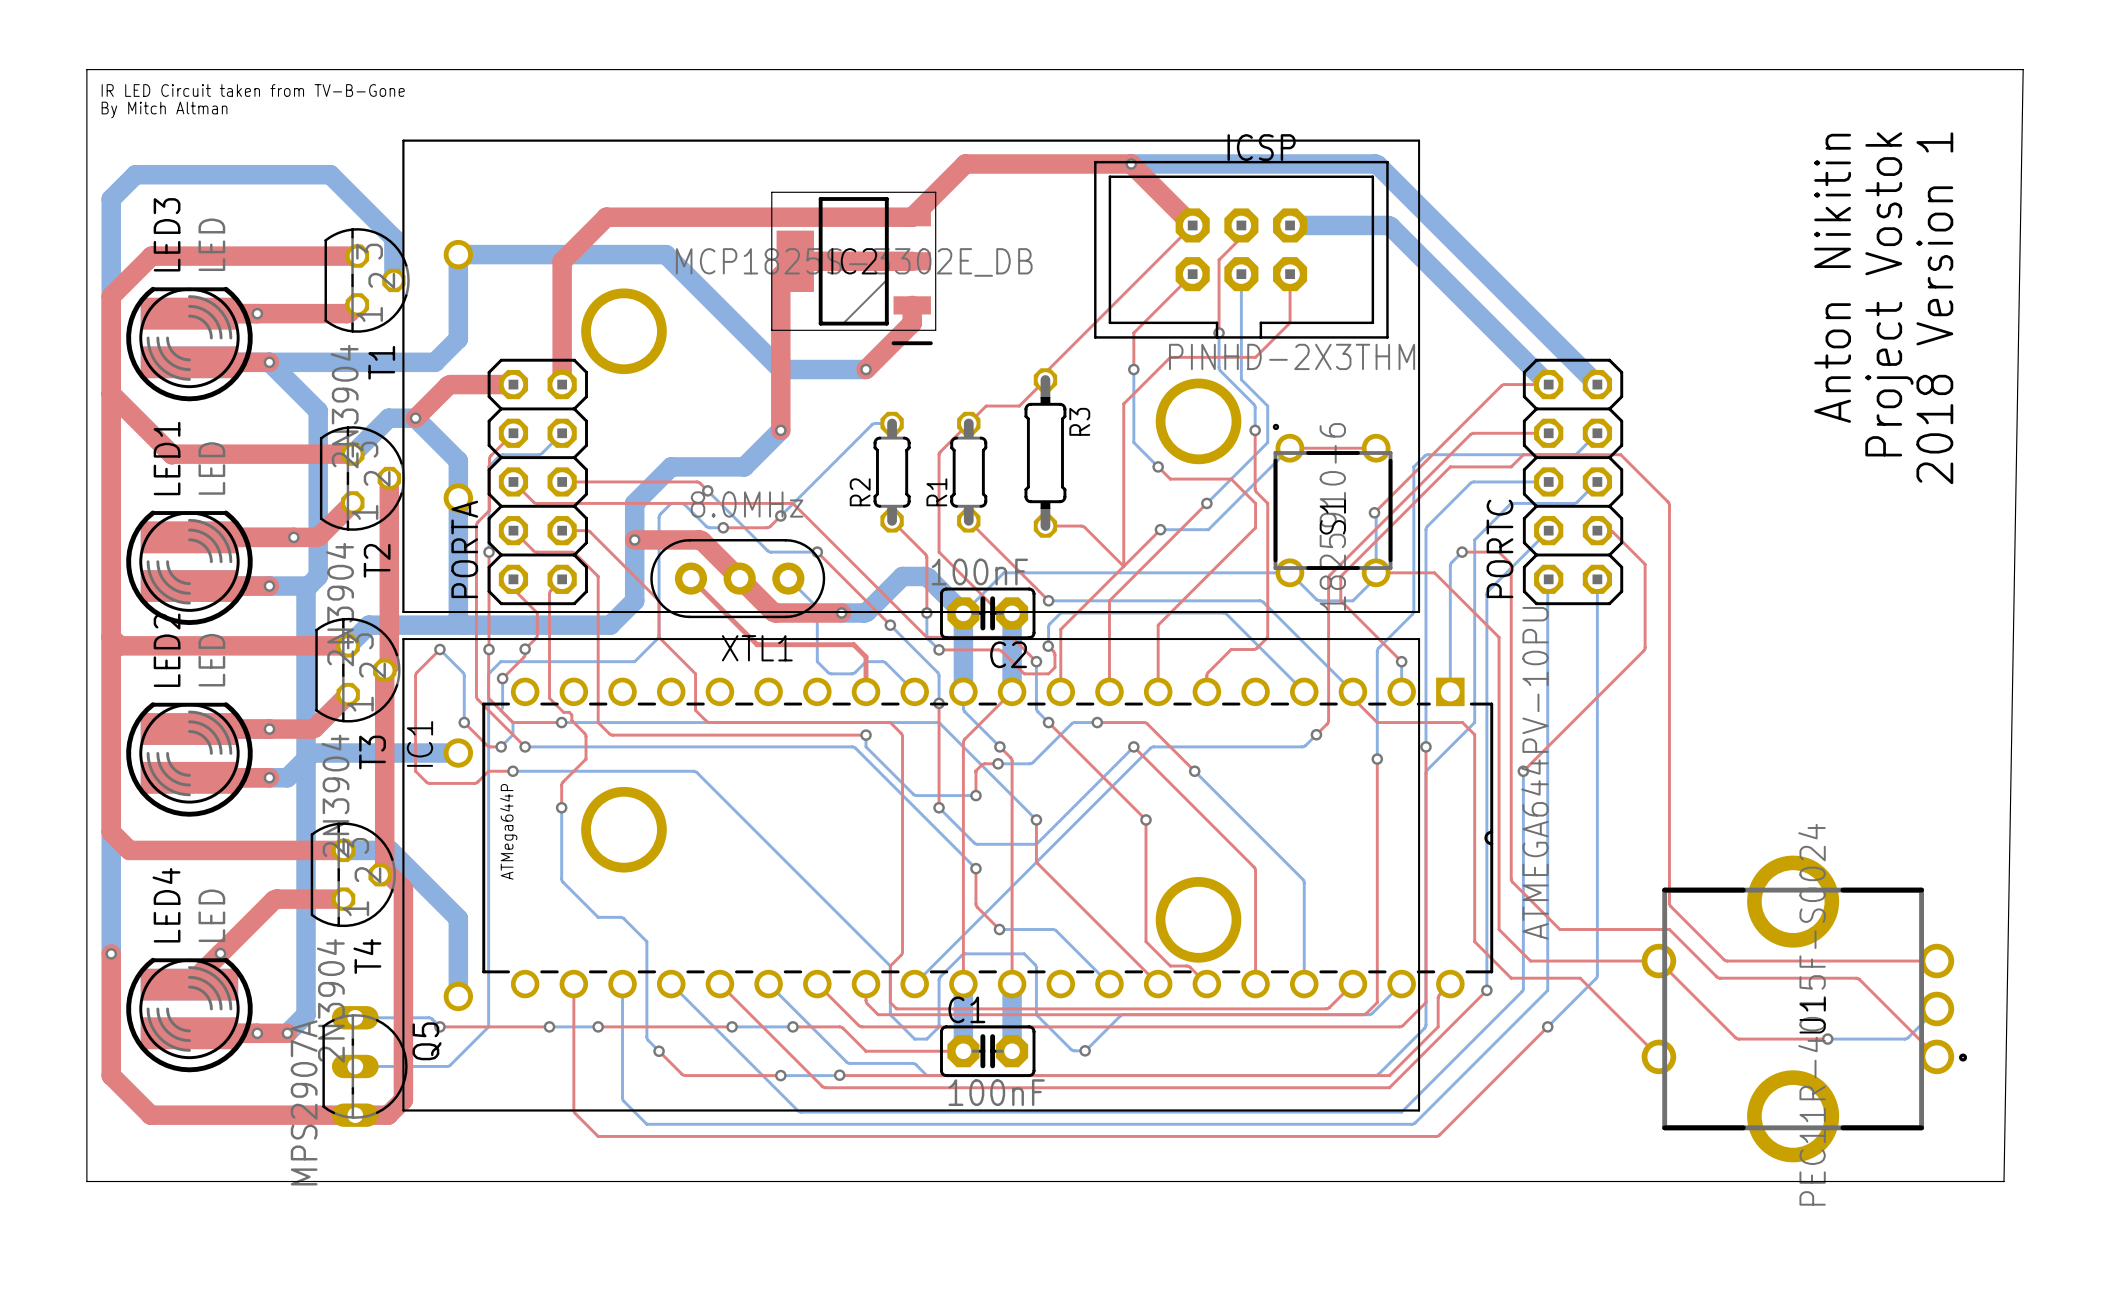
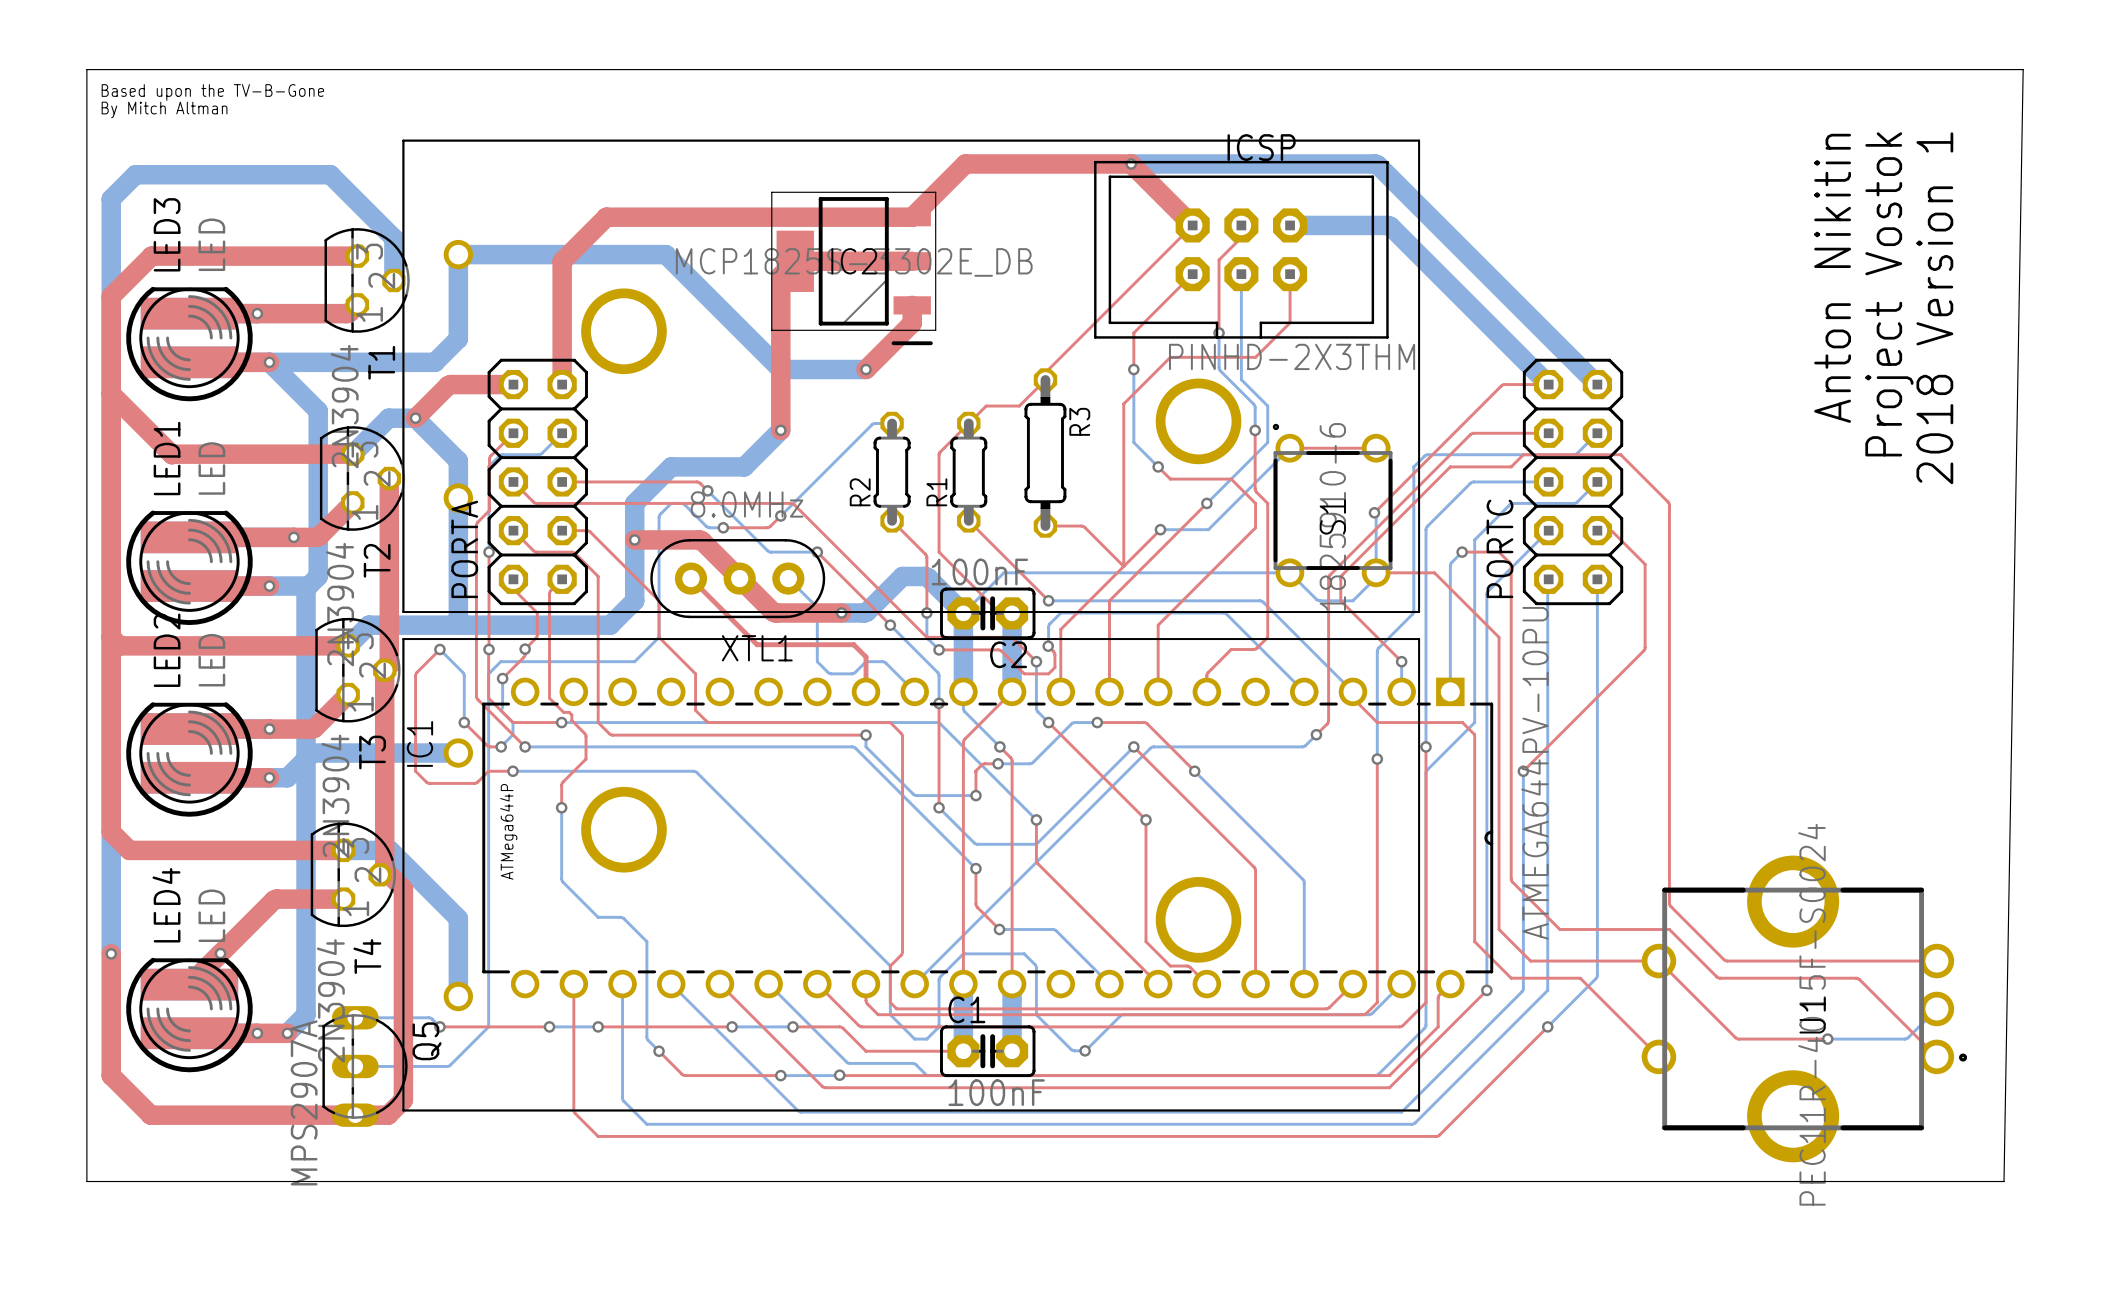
text: IR LED Circuit taken from TV-B-Gone (253, 90) -> Based upon the TV-B-Gone (212, 92)

